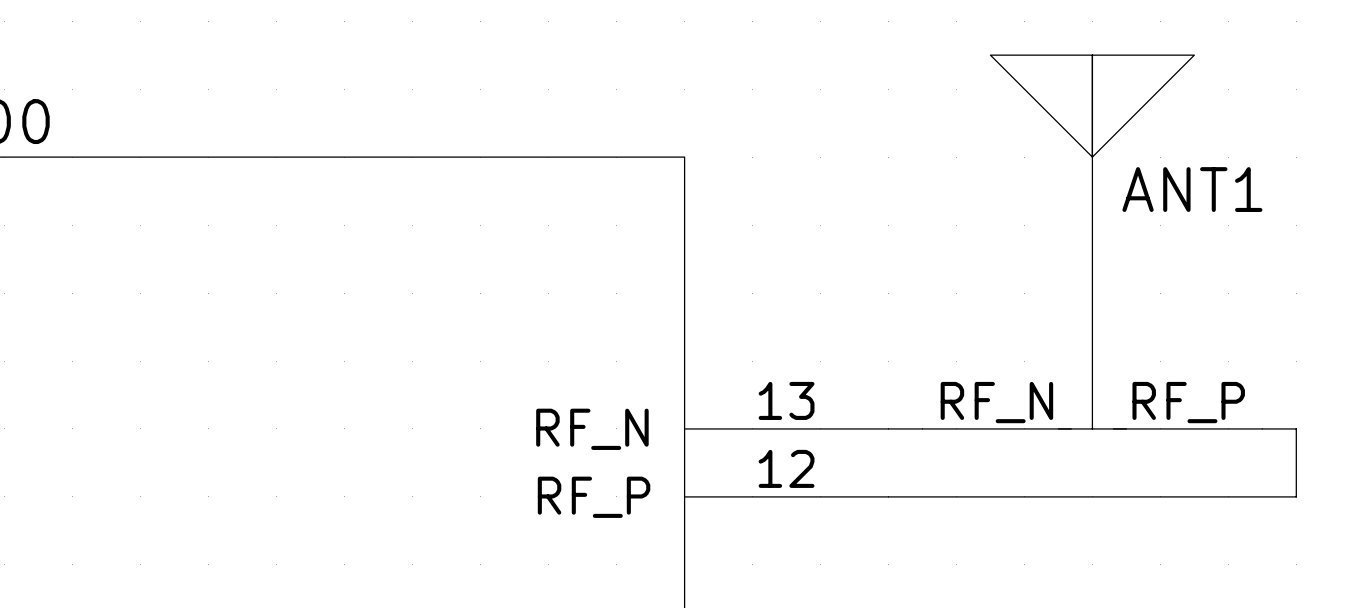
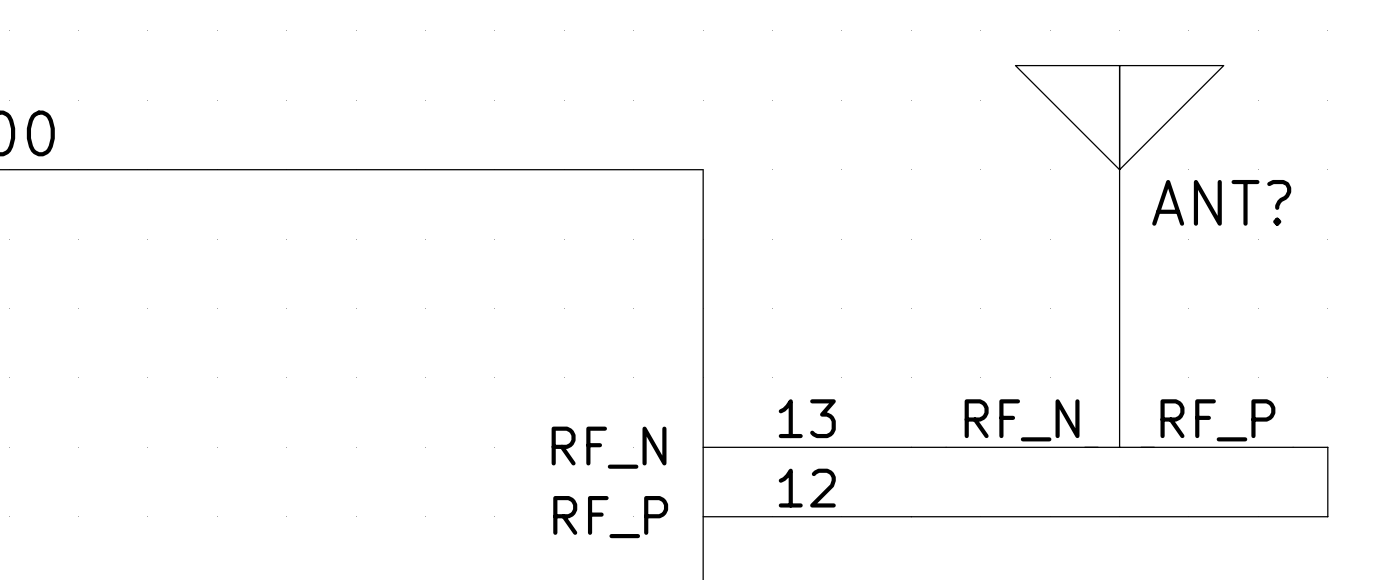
ANT1 name: ANT1 (1192, 189) -> ANT? (1221, 202)

